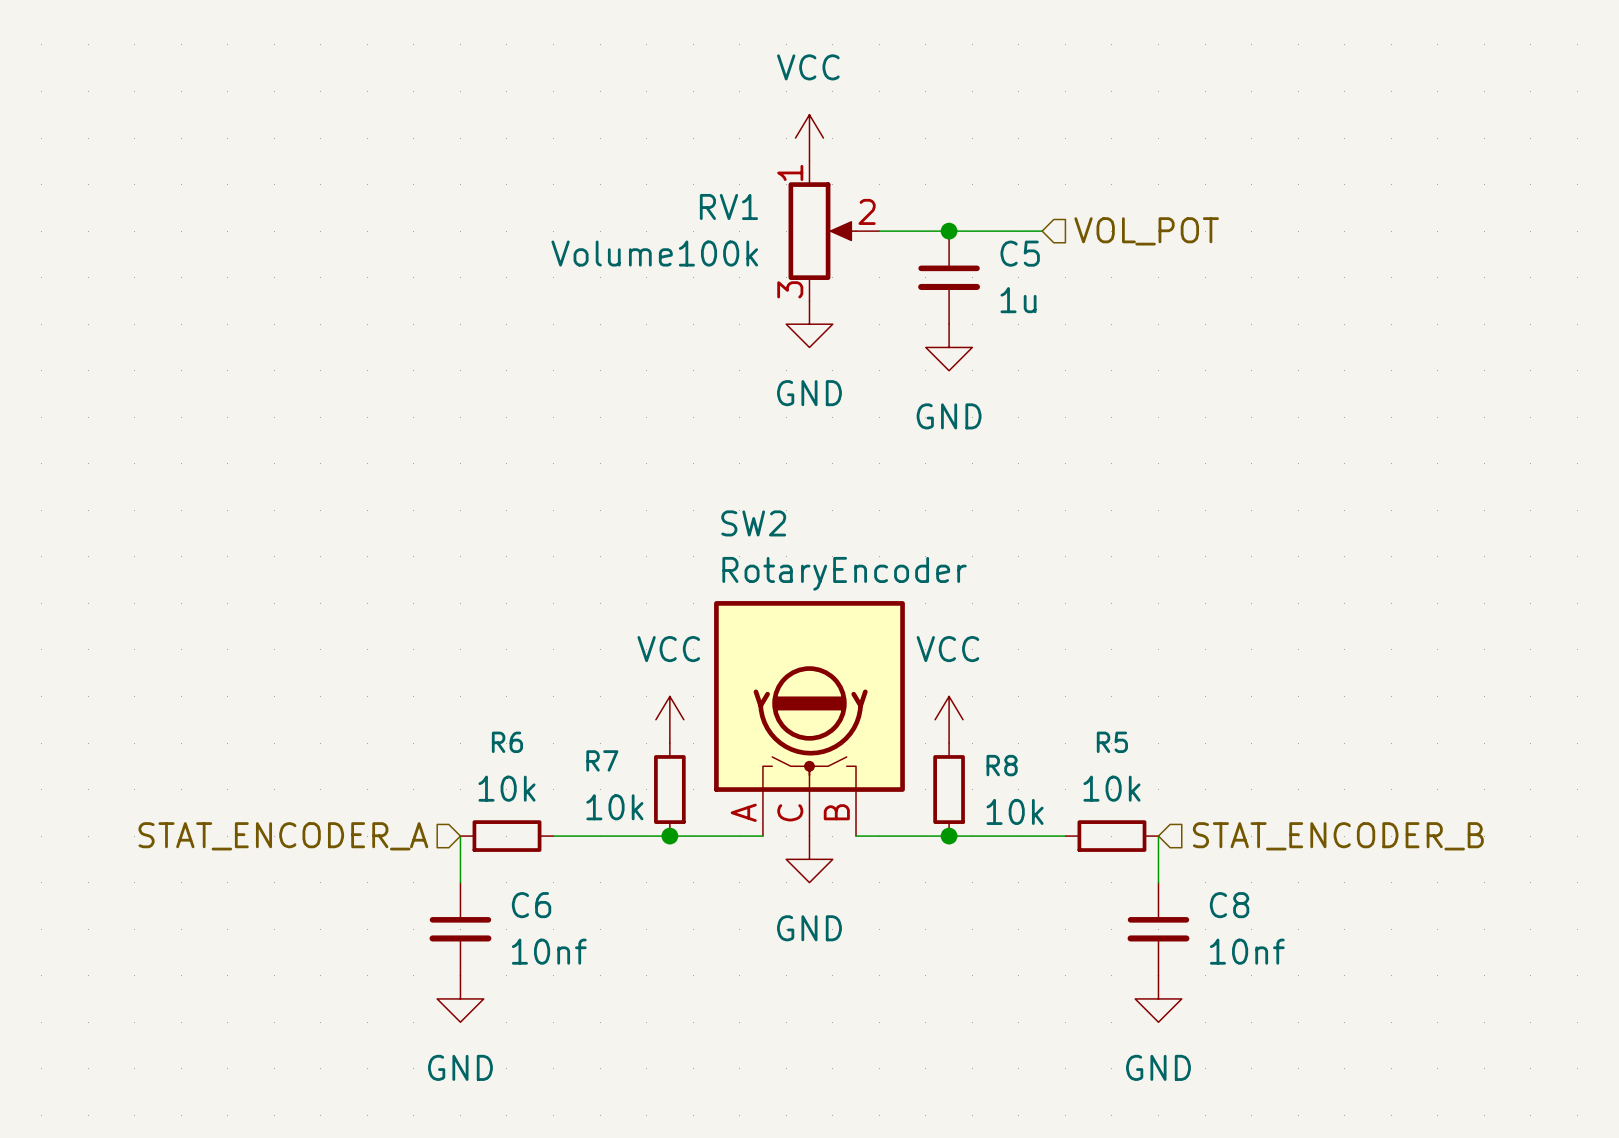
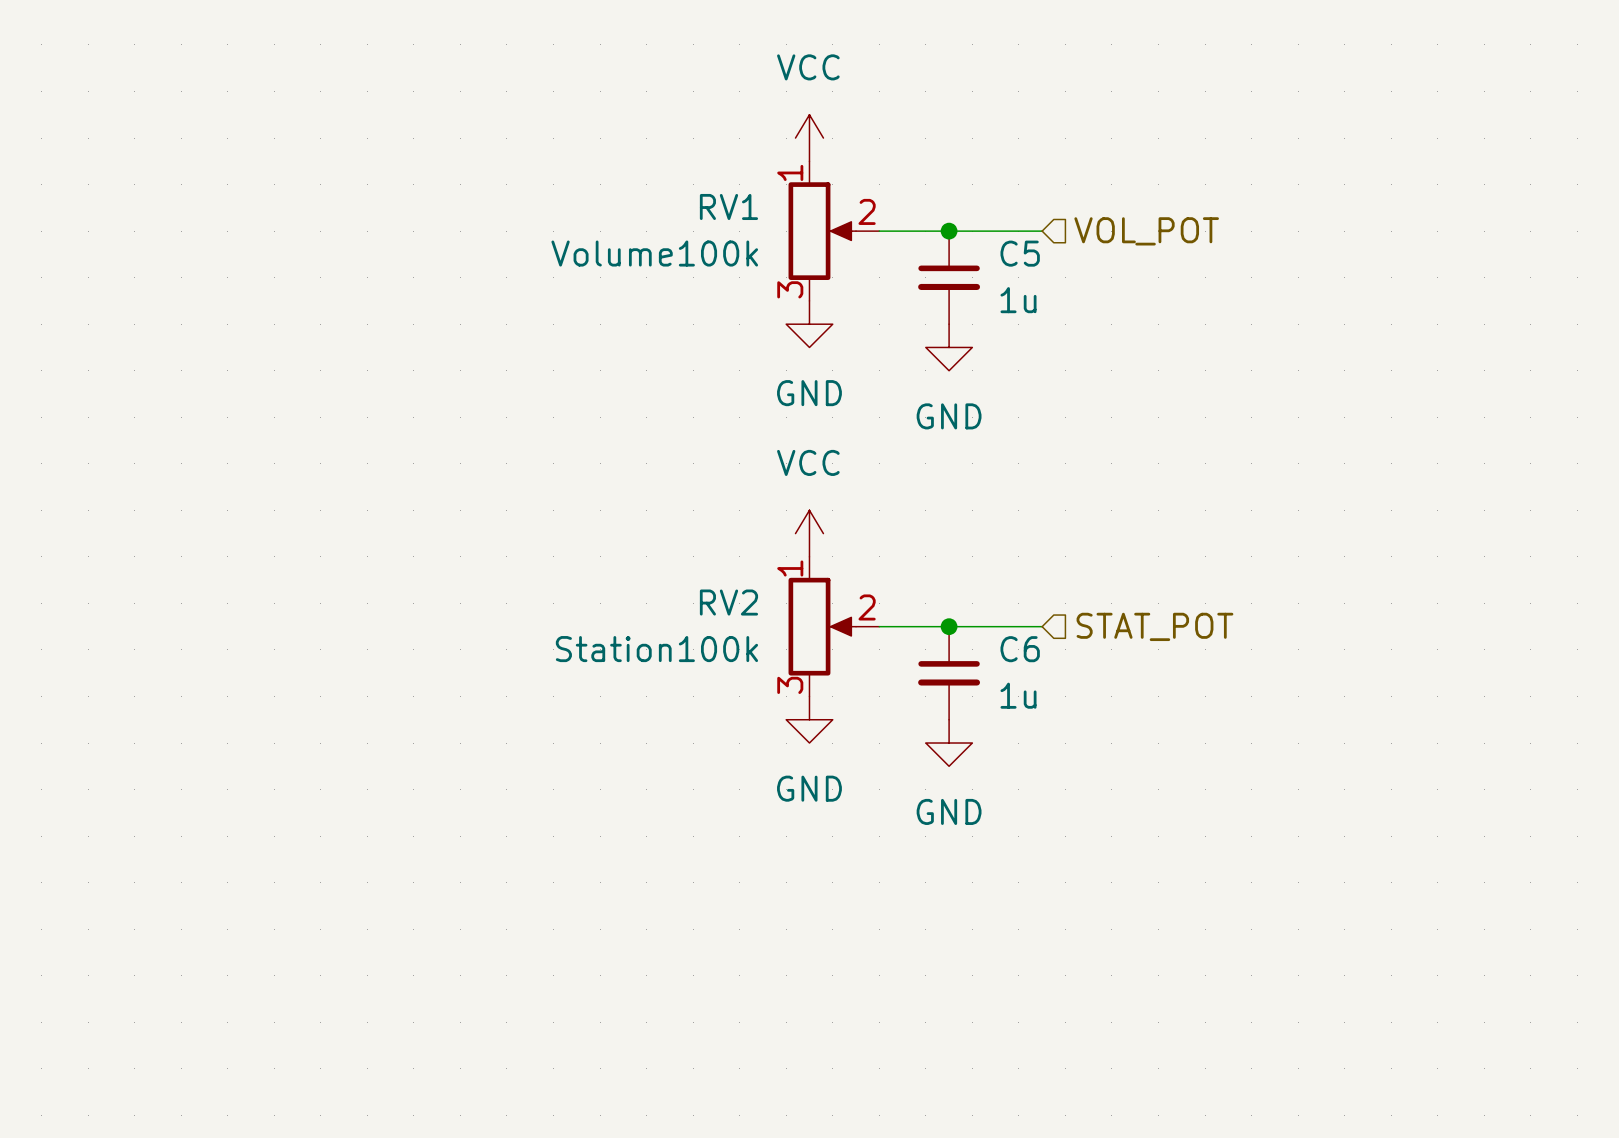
power symbol: none -> VCC (809, 533)
RV2: none -> Station100k (833, 626)
wire: none -> (879, 626) (1042, 626)
junction: none -> (949, 626)
hierarchical label: none -> STAT_POT (1154, 626)
SW2: RotaryEncoder (809, 718) -> none
power symbol: VCC (669, 719) -> none
power symbol: none -> GND (809, 719)
power symbol: VCC (949, 719) -> none
power symbol: none -> GND (949, 743)
R7: 10k (669, 789) -> none
R8: 10k (949, 789) -> none
hierarchical label: STAT_ENCODER_A (283, 836) -> none
wire: (460, 836) (460, 882) -> none
R6: 10k (506, 836) -> none
wire: (553, 836) (762, 836) -> none
junction: (669, 836) -> none
wire: (856, 836) (1065, 836) -> none
junction: (949, 836) -> none
R5: 10k (1111, 836) -> none
wire: (1158, 836) (1158, 882) -> none
hierarchical label: STAT_ENCODER_B (1338, 836) -> none
power symbol: GND (809, 859) -> none
C6 position: (460, 929) -> (949, 673)
C8: 10nf (1158, 929) -> none
C6 value: 10nf (549, 951) -> 1u (1018, 695)
power symbol: GND (460, 998) -> none
power symbol: GND (1158, 998) -> none

